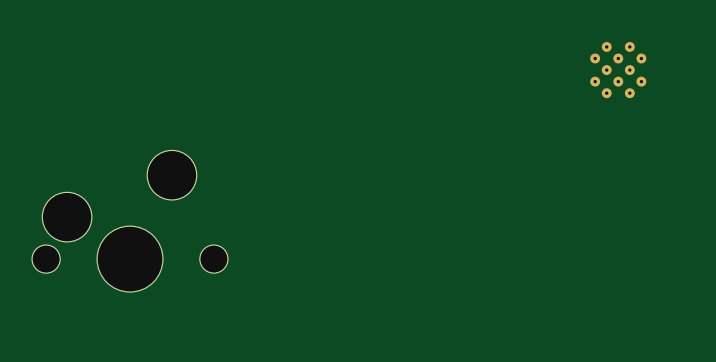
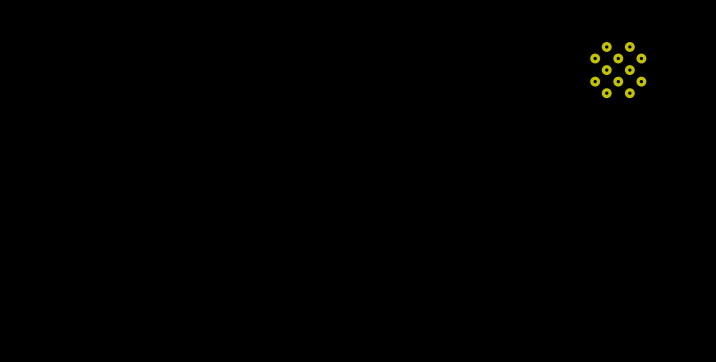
part: (130, 221) -> none

